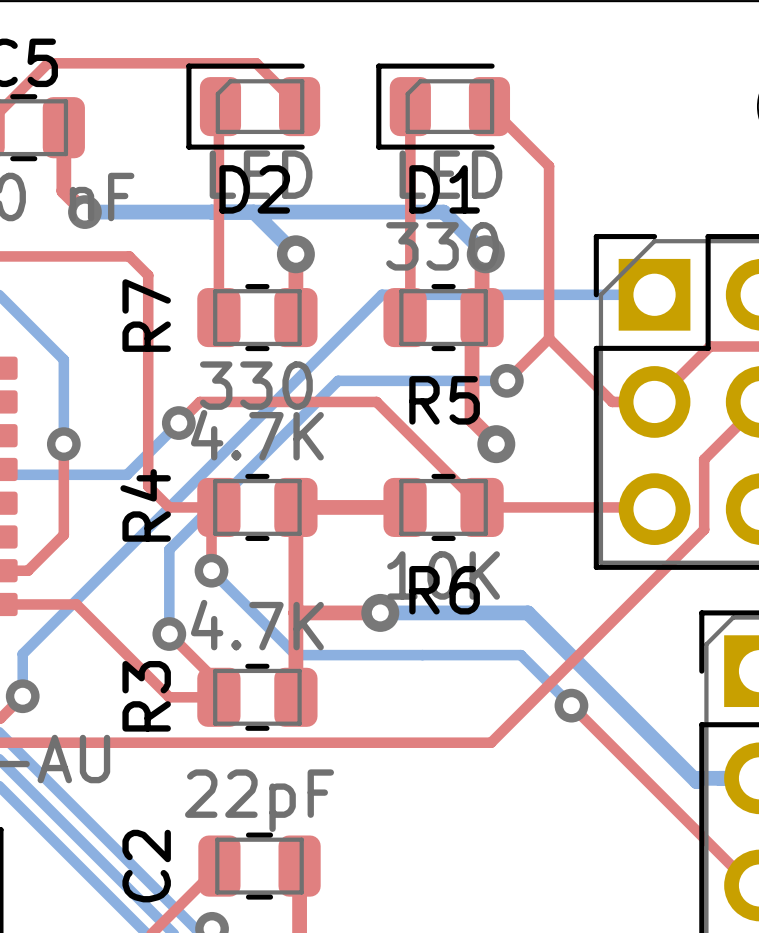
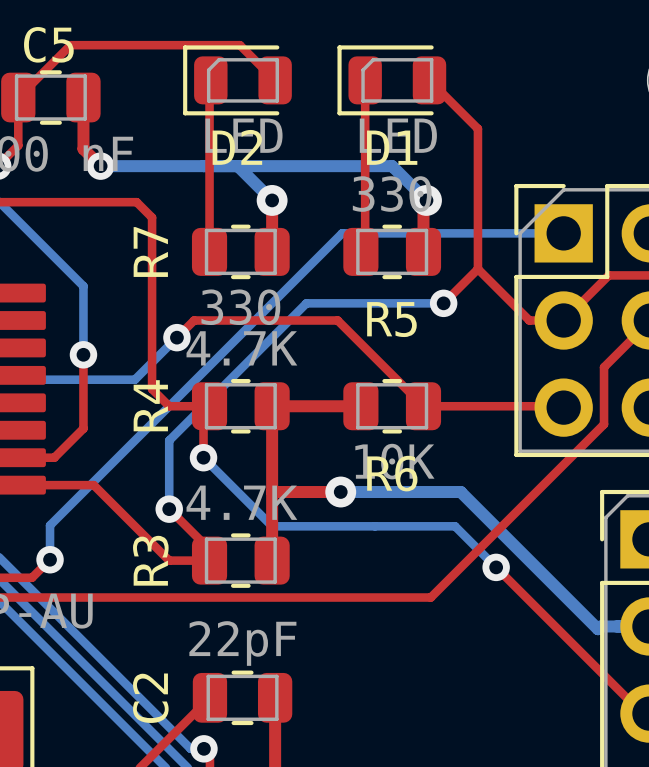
top track: (482, 317) (472, 327) (472, 419) (496, 444) -> none
via: (496, 444) -> none

